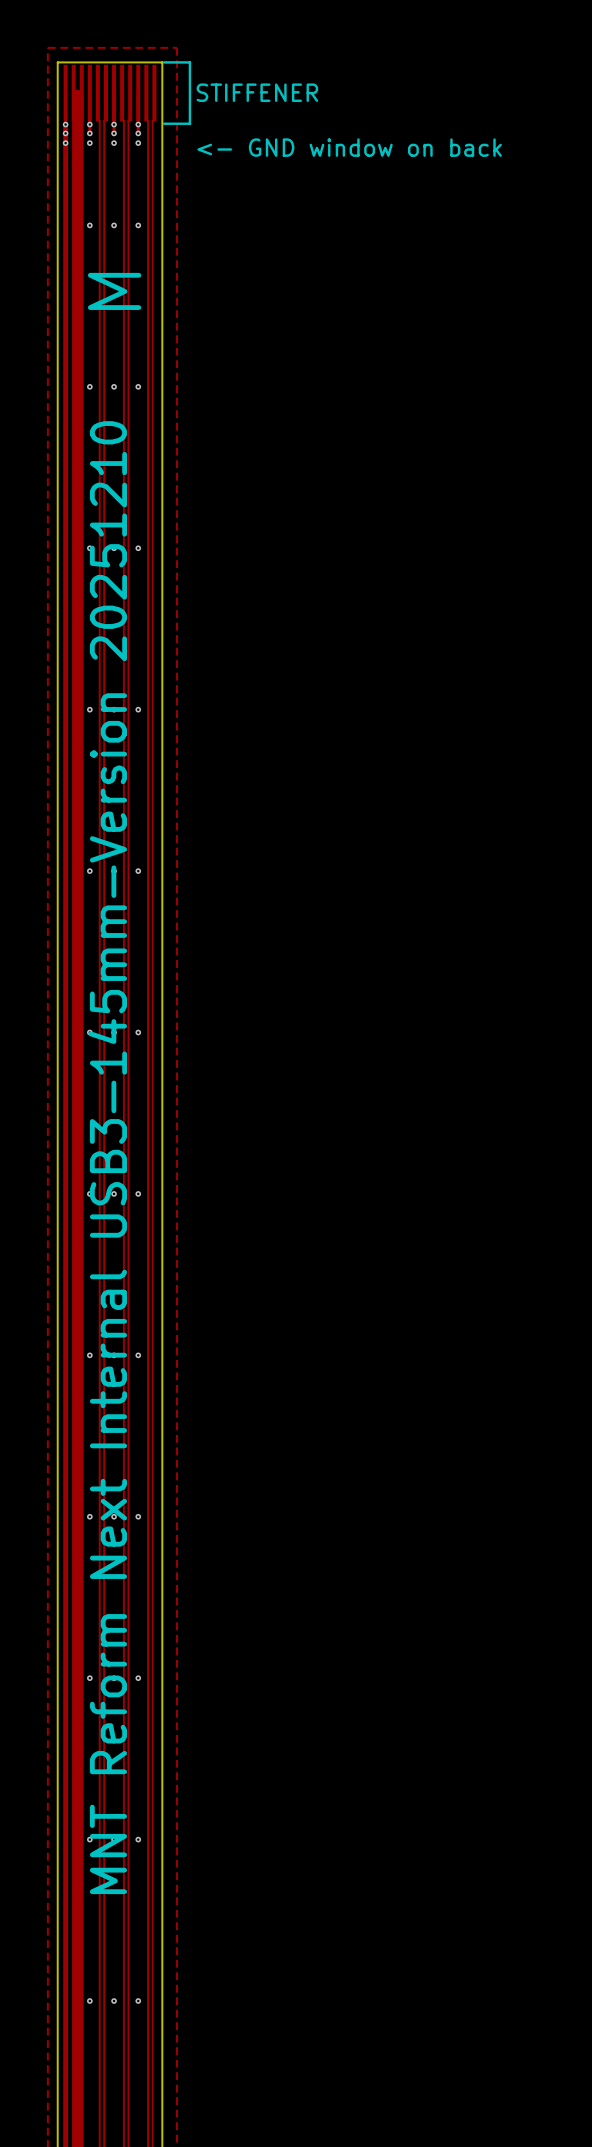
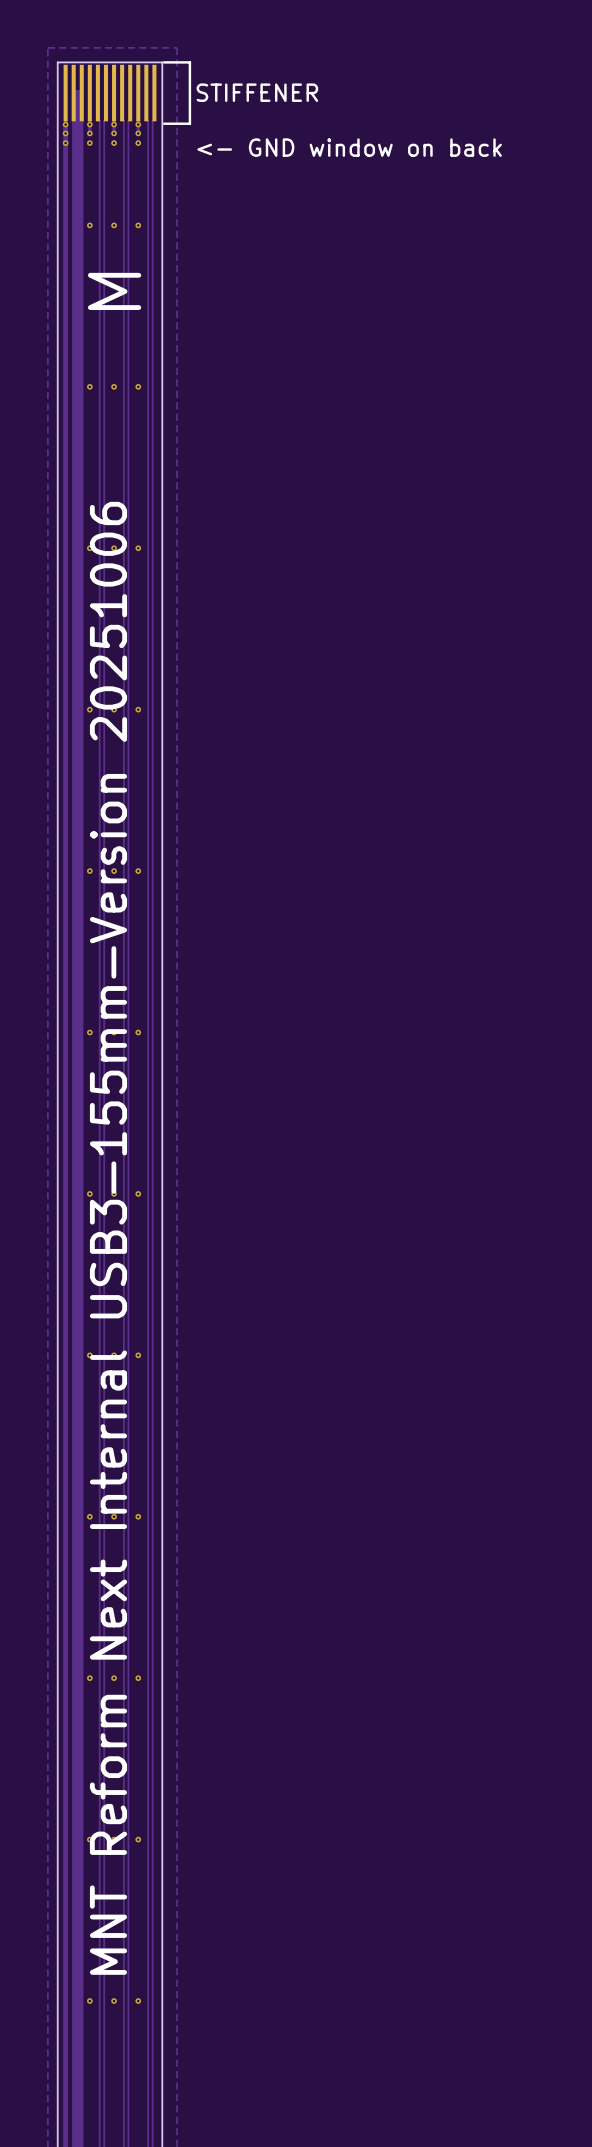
text: MNT Reform Next Internal USB3—145mm—Version 20251210 (107, 1157) -> MNT Reform Next Internal USB3—155mm—Version 20251006 (108, 1238)

